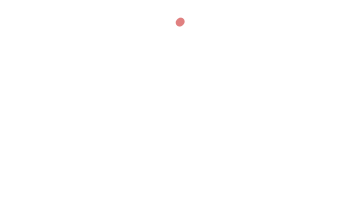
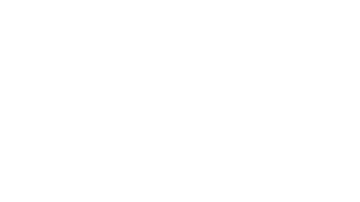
top track: (180, 21) (179, 22) -> none

